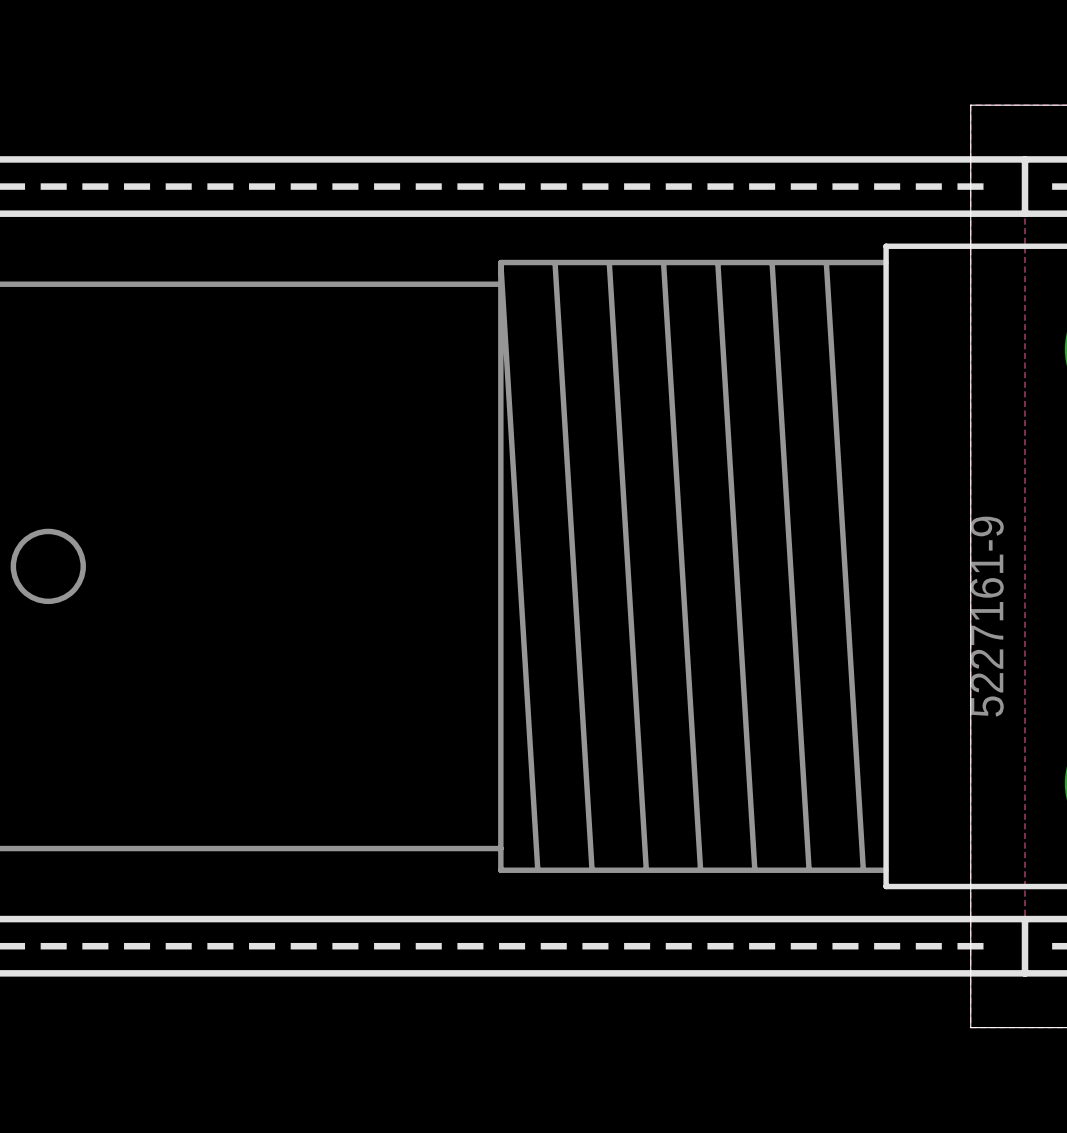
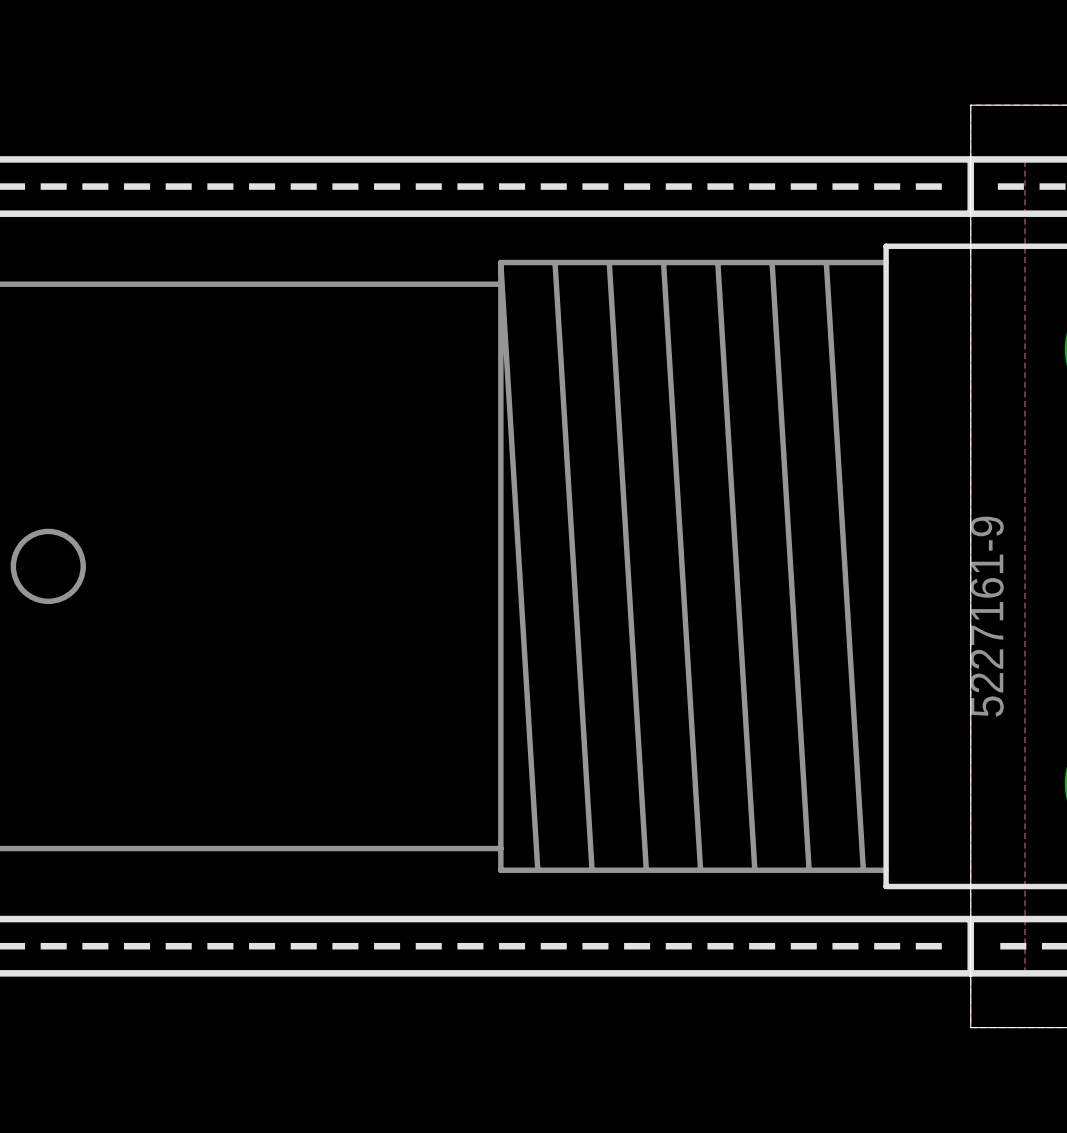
line: (1025, 159) (1025, 213) -> (970, 159) (970, 213)
line: (943, 186) (997, 186) -> (1052, 186) (997, 186)
line: (1025, 919) (1025, 973) -> (970, 919) (970, 973)
line: (943, 946) (997, 946) -> (1052, 946) (997, 946)

